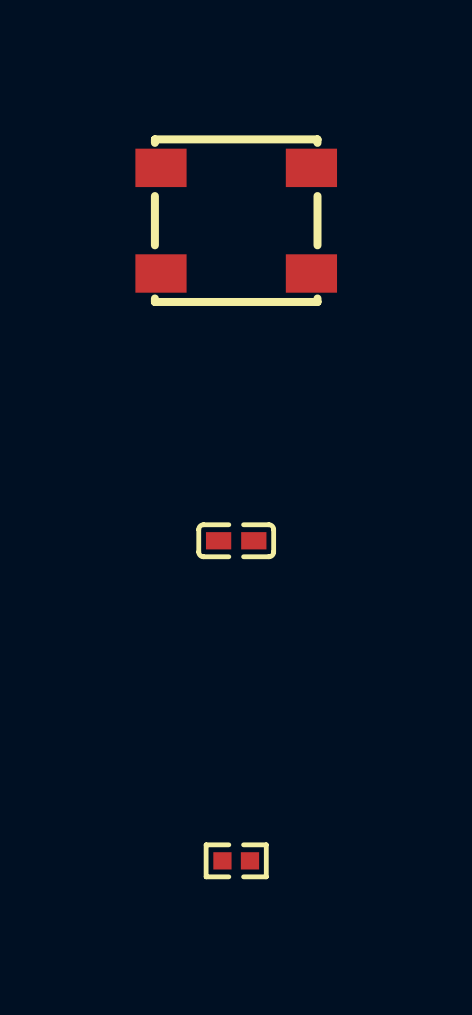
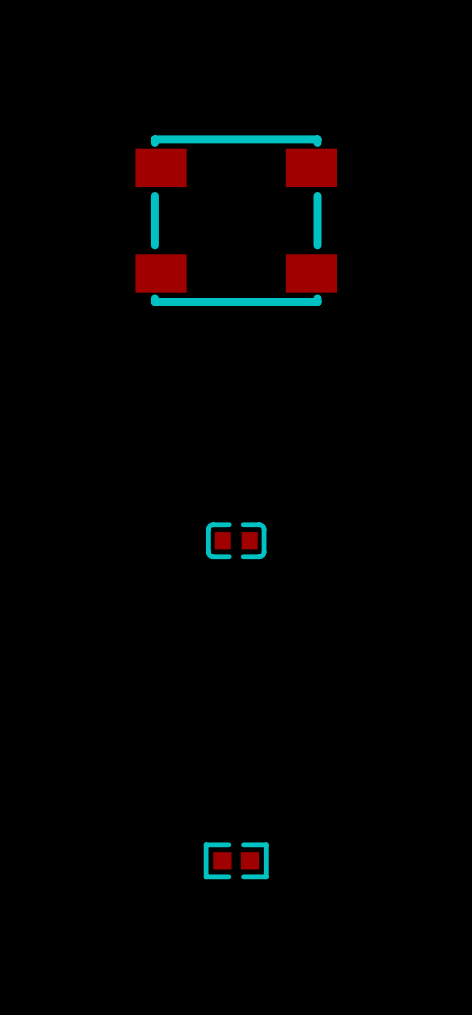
part footprint: [196, 522, 277, 560] -> [205, 522, 267, 560]

